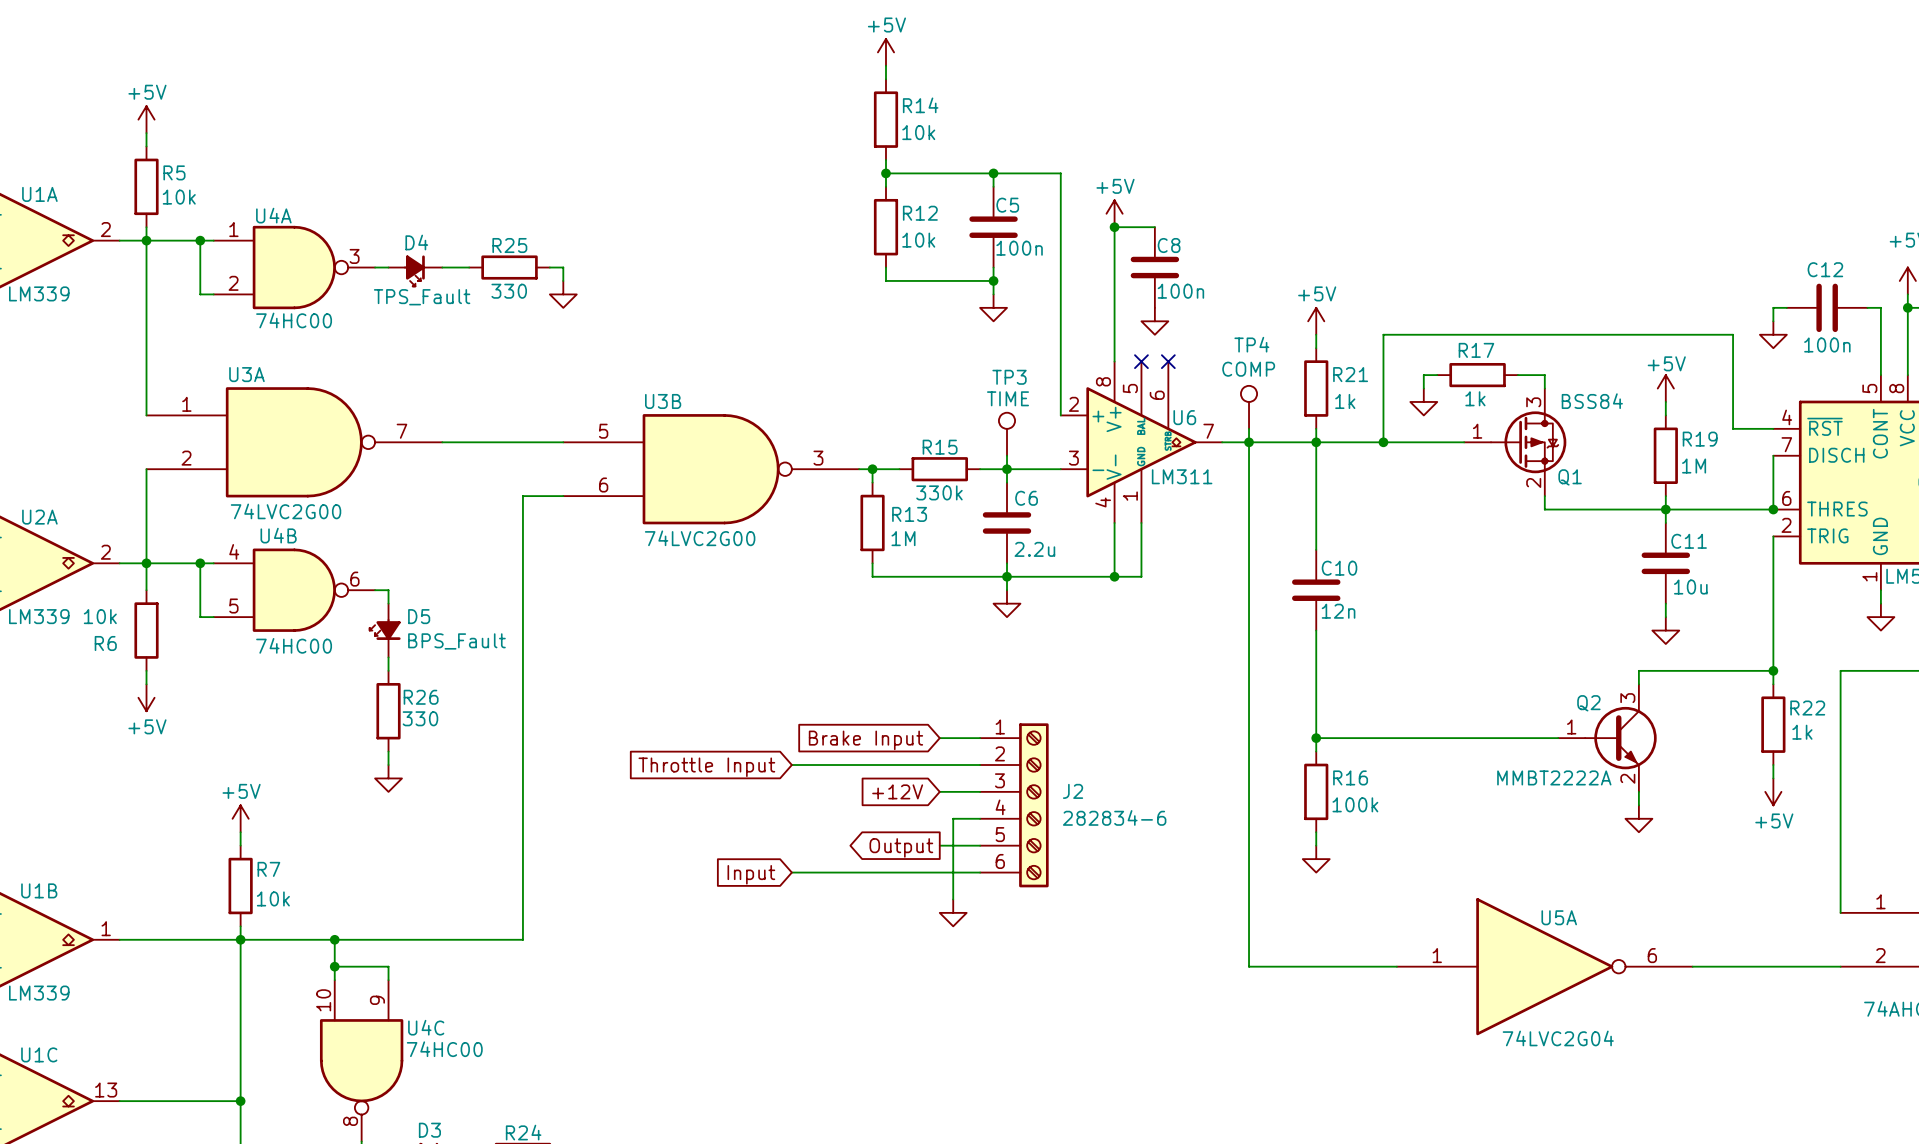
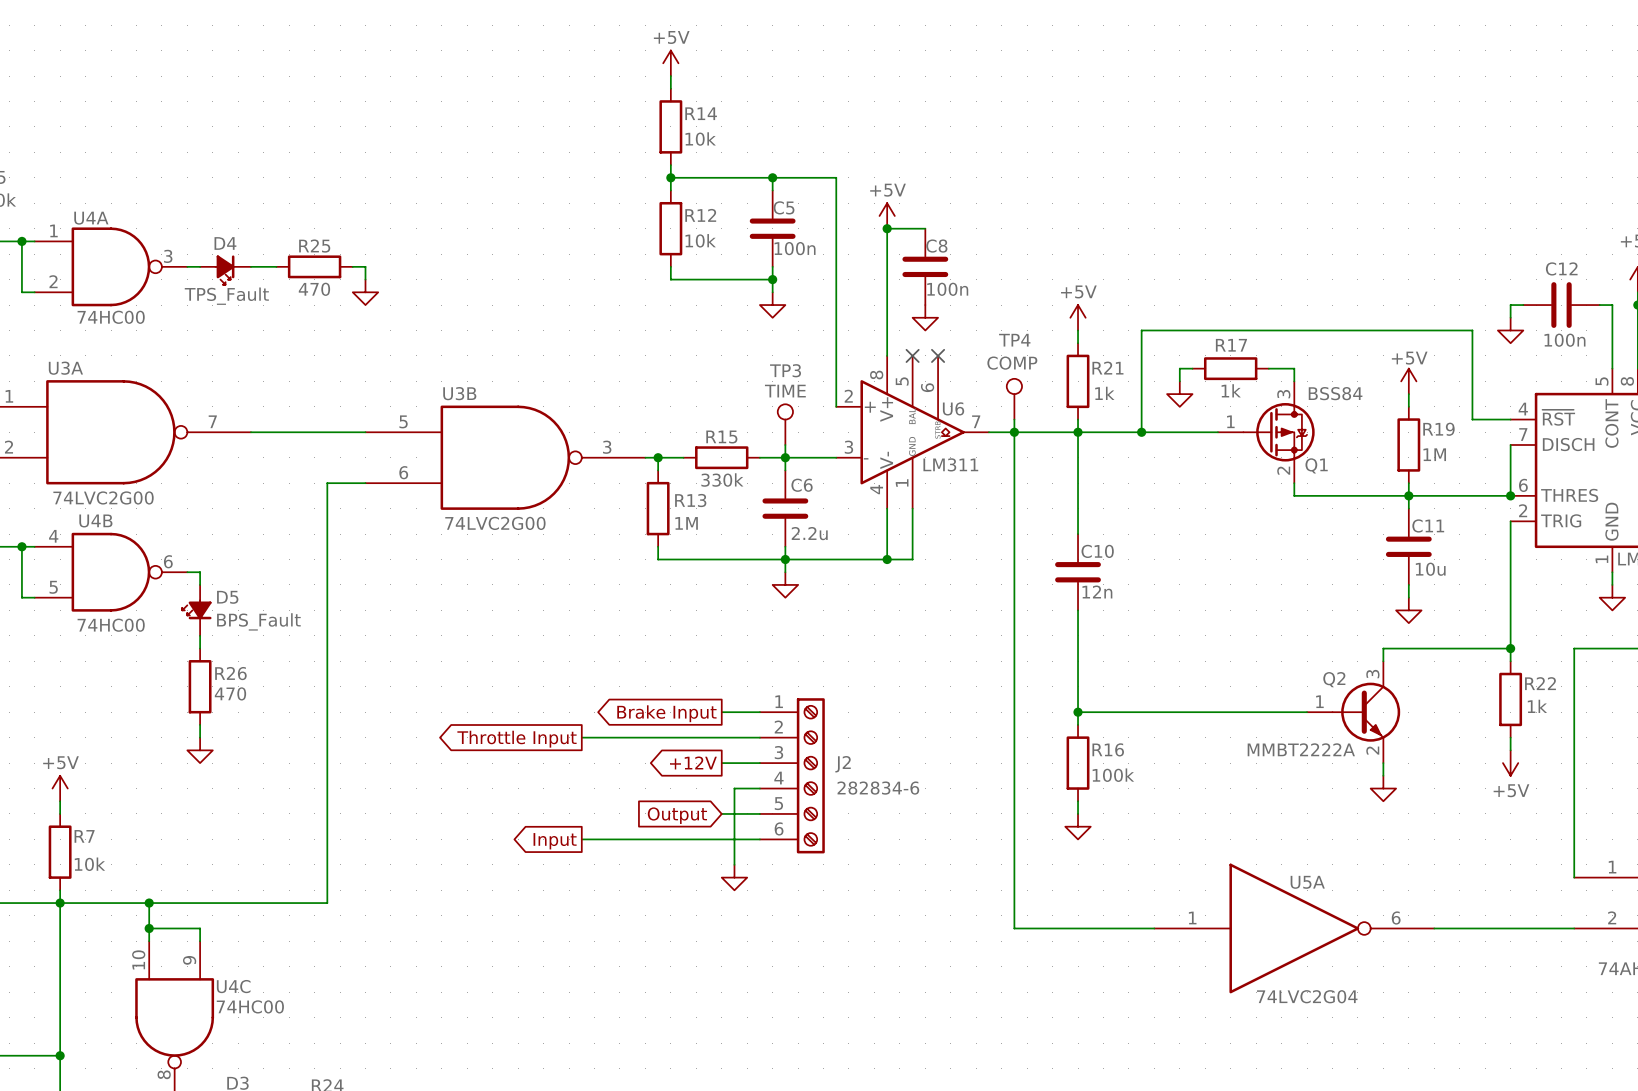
R25 value: 330 (509, 291) -> 470 (314, 289)
R26 value: 330 (420, 718) -> 470 (230, 693)
global label shape: input (865, 740) -> output (666, 713)
global label shape: input (706, 767) -> output (517, 739)
global label shape: input (897, 791) -> output (693, 762)
global label shape: output (901, 847) -> input (677, 815)
global label shape: input (751, 874) -> output (555, 841)

